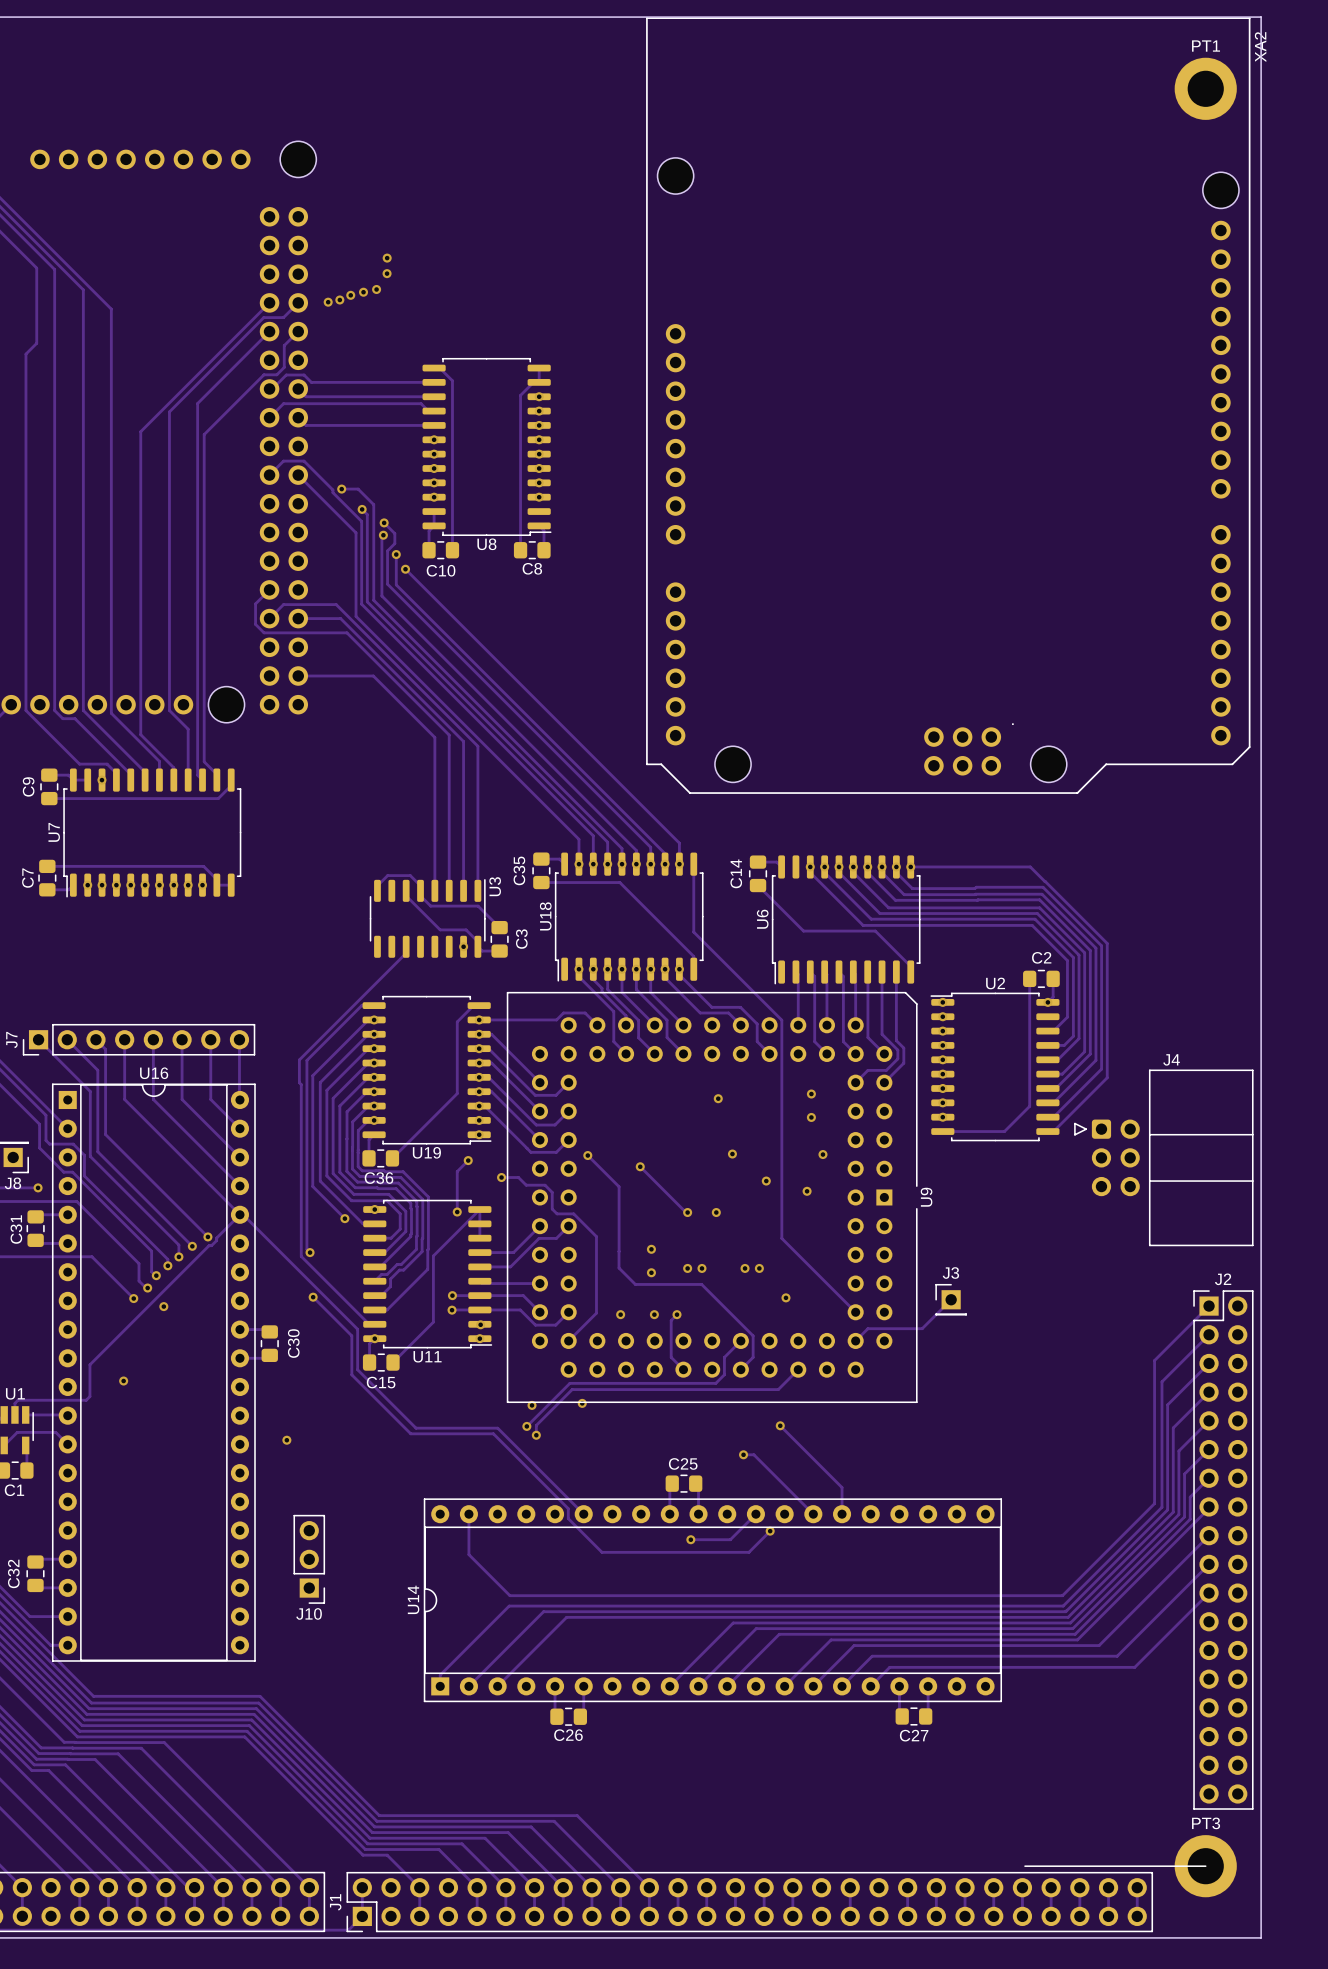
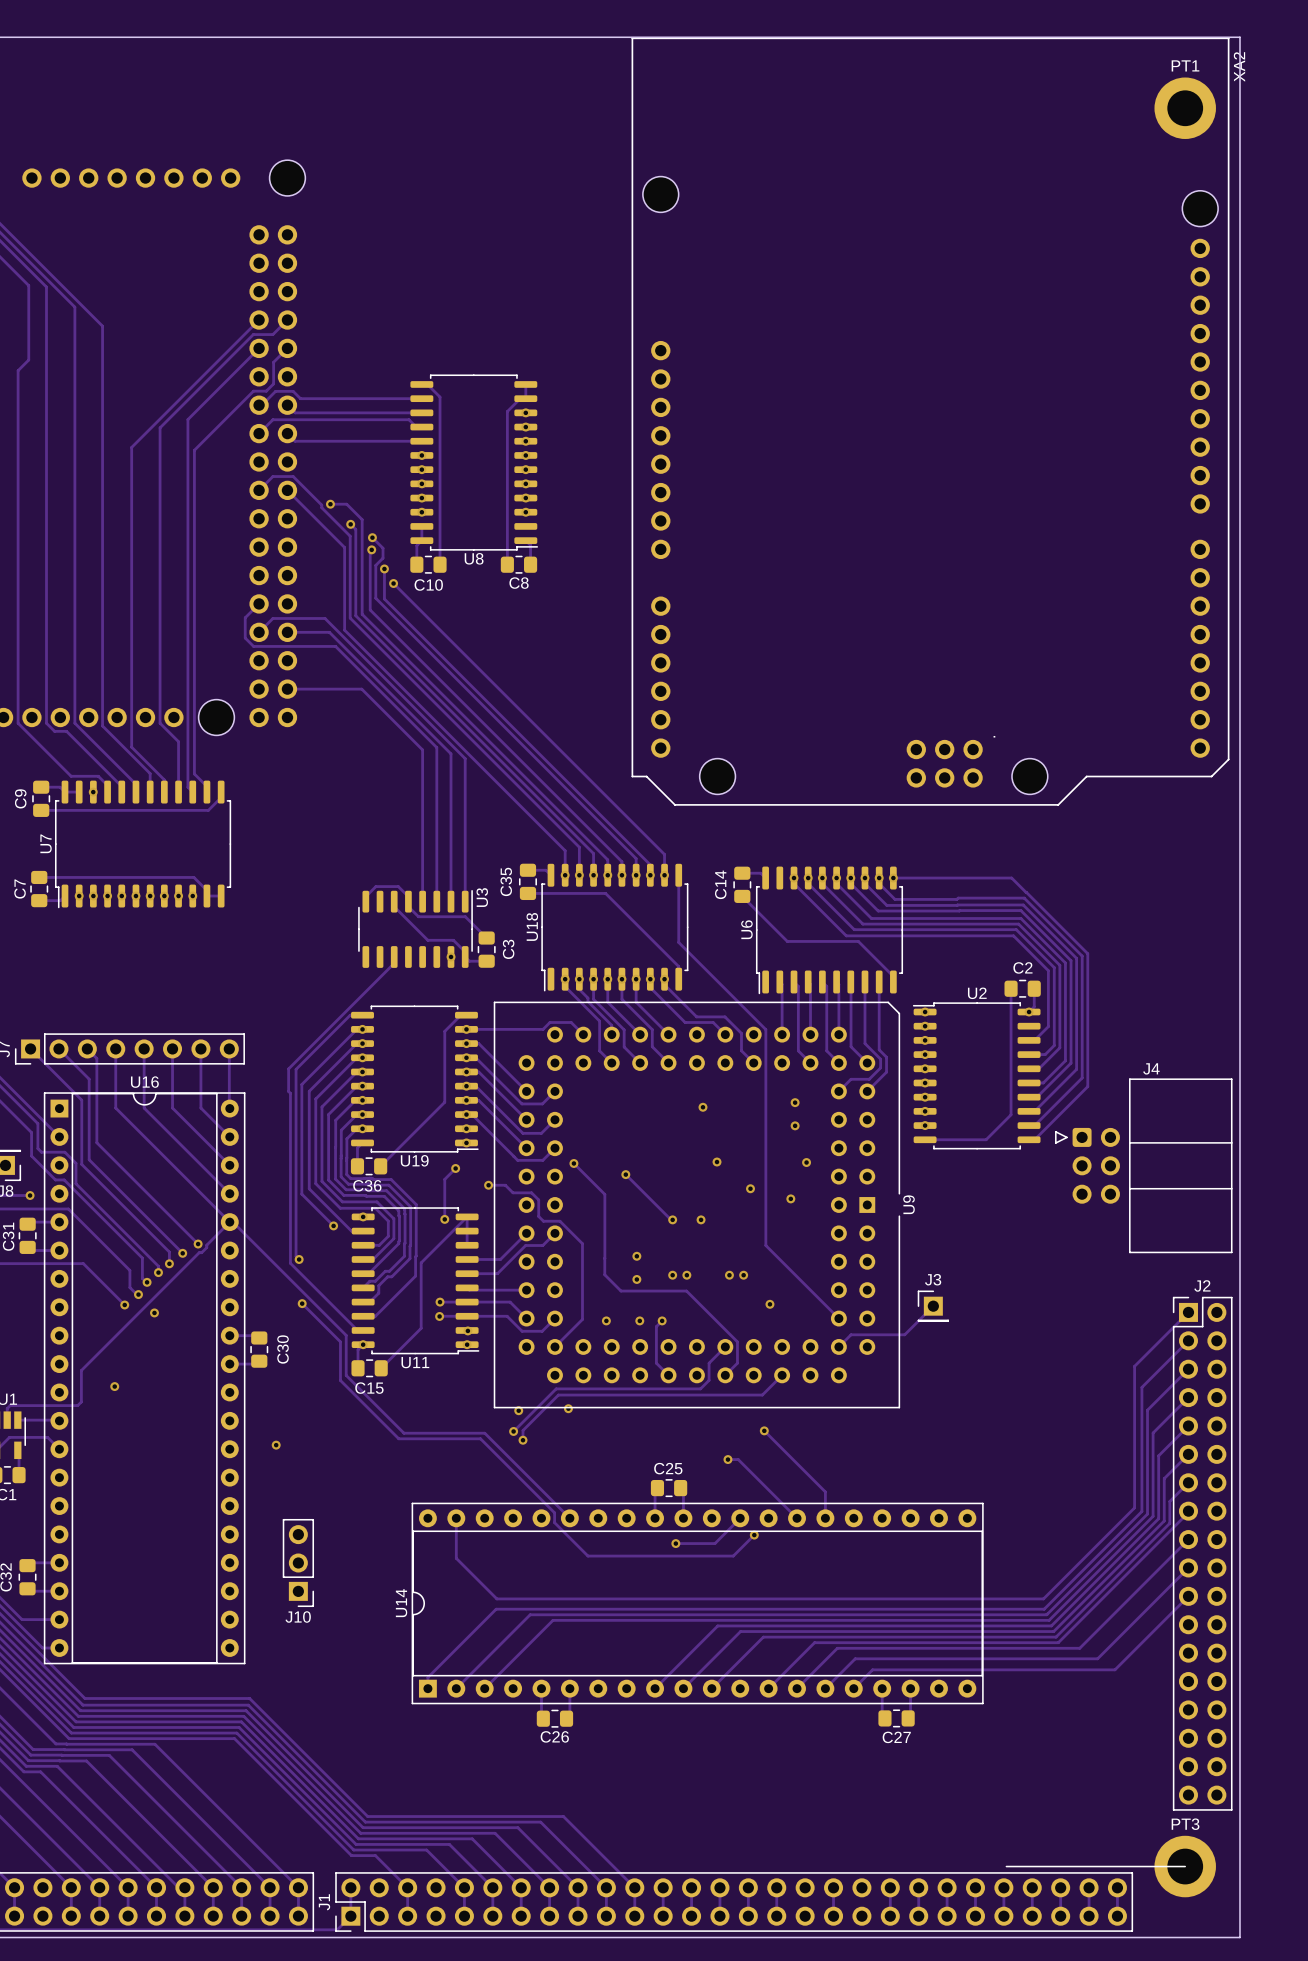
via: (387, 258) -> none
via: (387, 273) -> none
via: (376, 289) -> none
via: (363, 292) -> none
via: (350, 295) -> none
via: (339, 299) -> none
via: (328, 302) -> none

